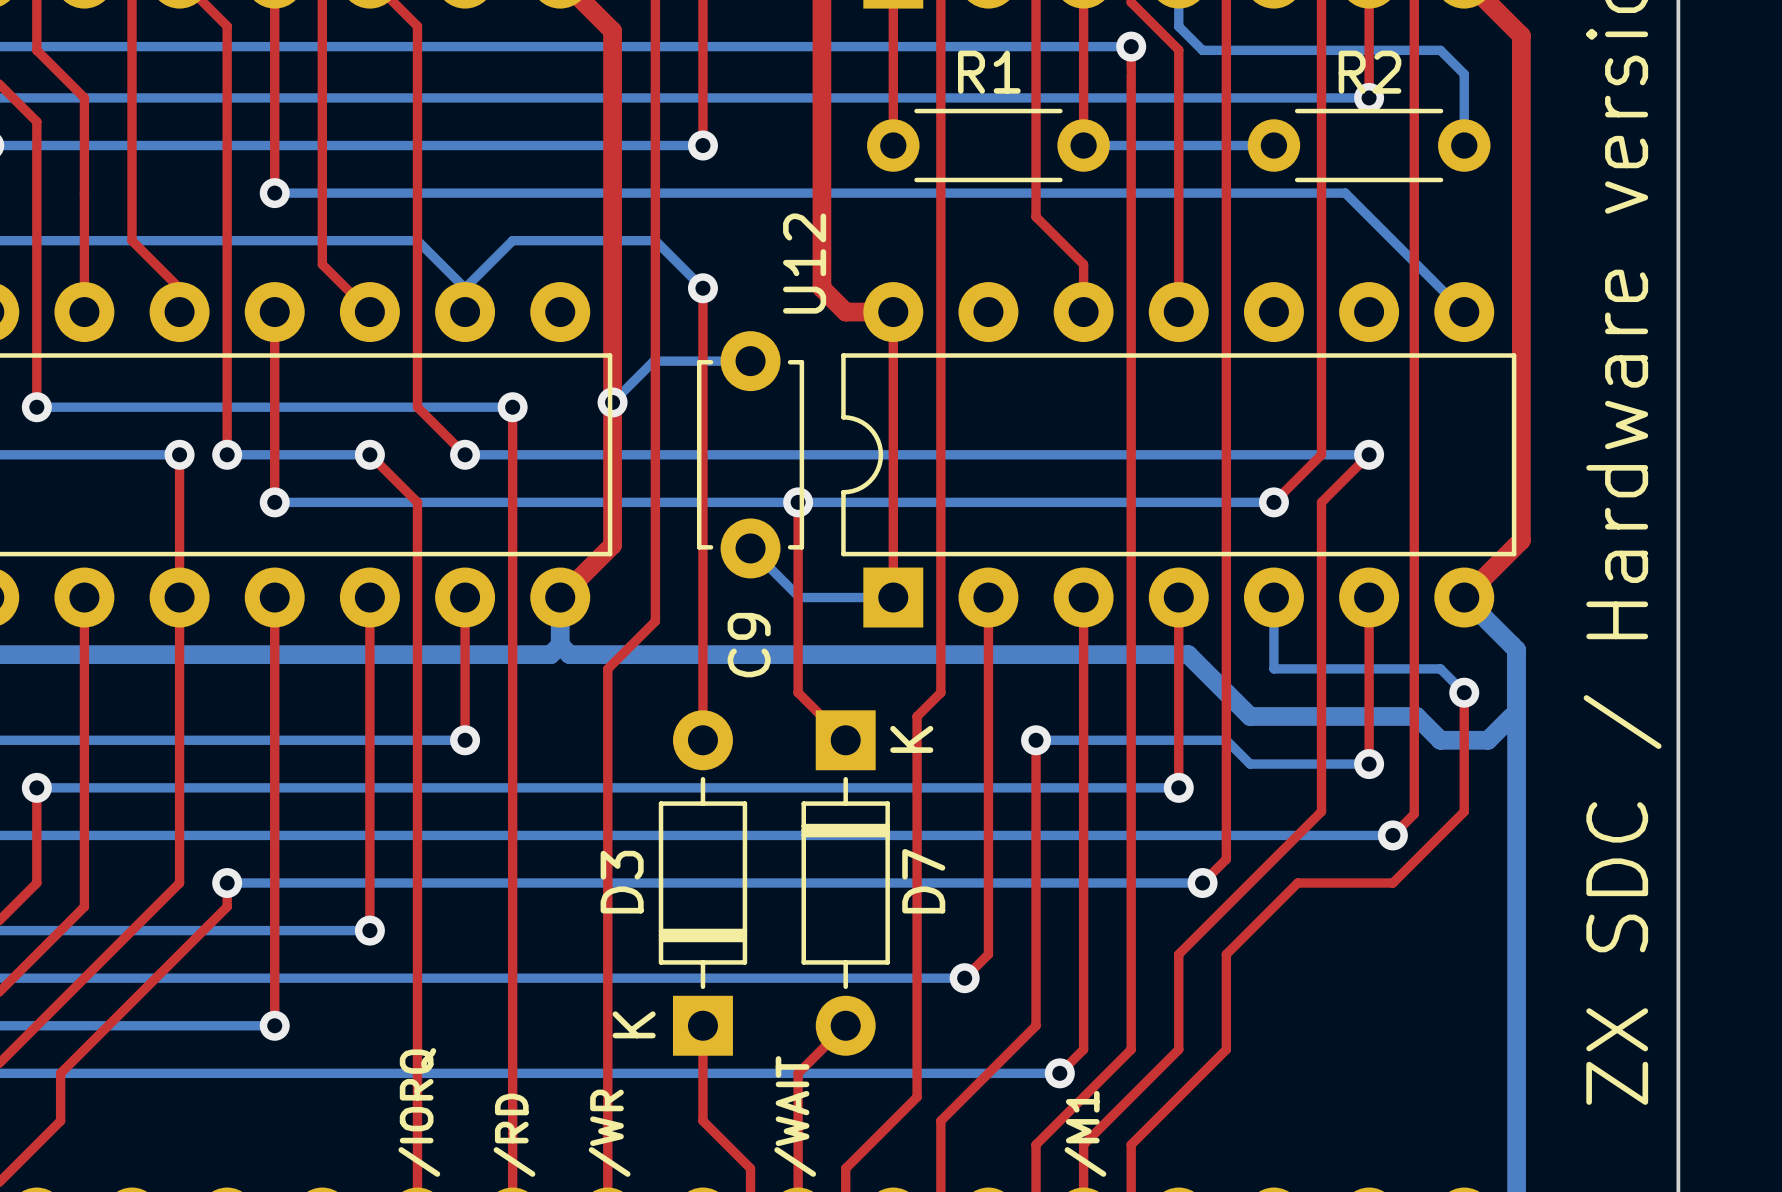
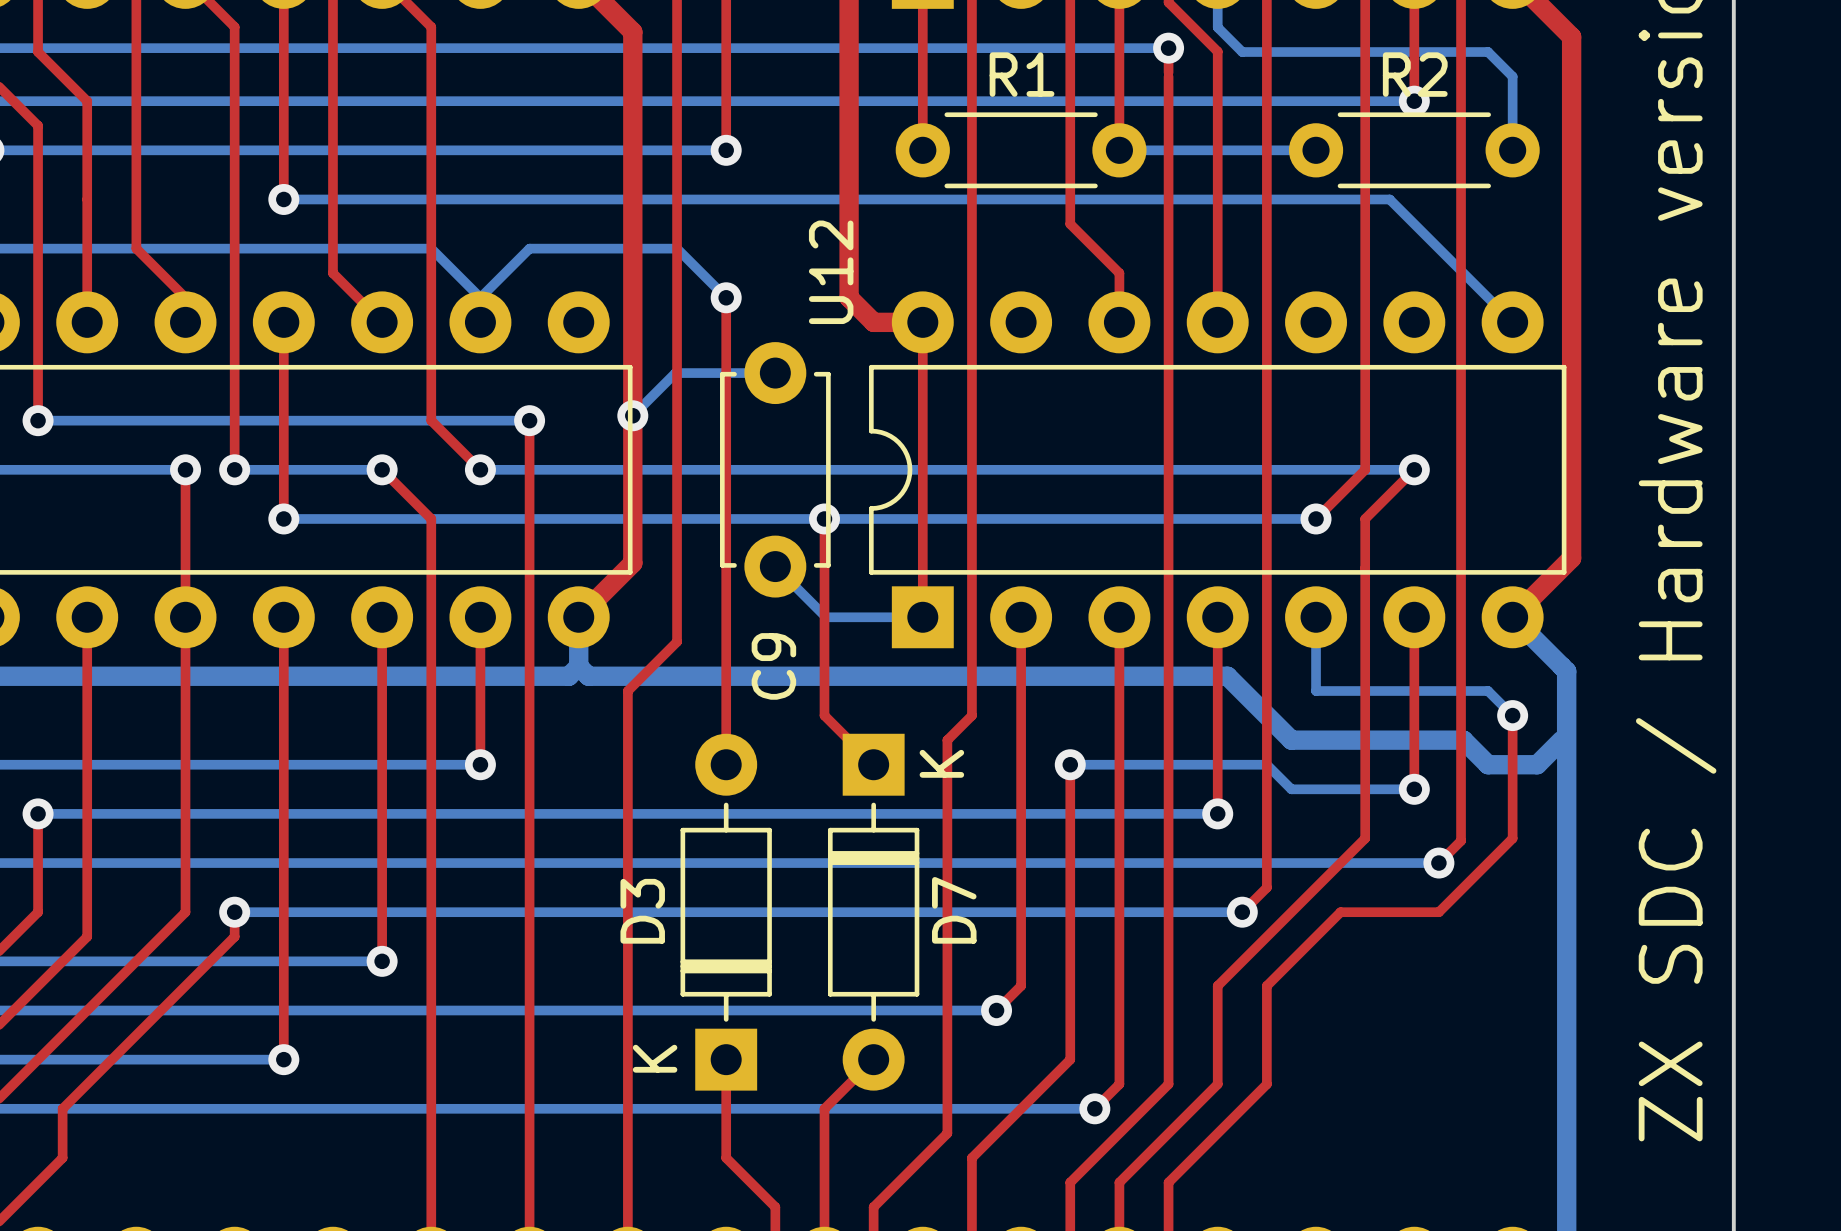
text: /IORQ (419, 1112) -> none
text: /WAIT (795, 1116) -> none
text: /WR (609, 1133) -> none
text: /M1 (1085, 1133) -> none
text: /RD (514, 1135) -> none

